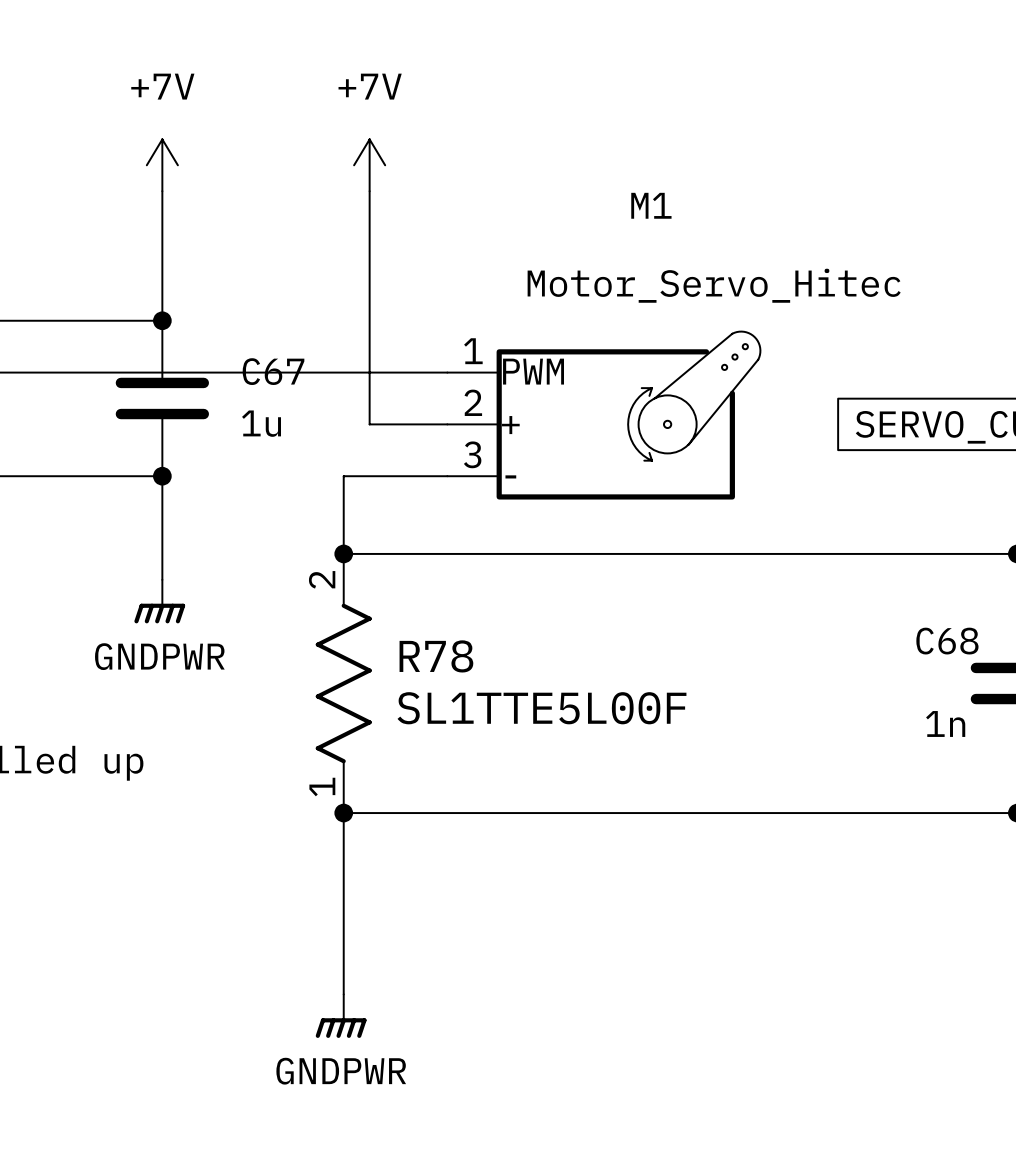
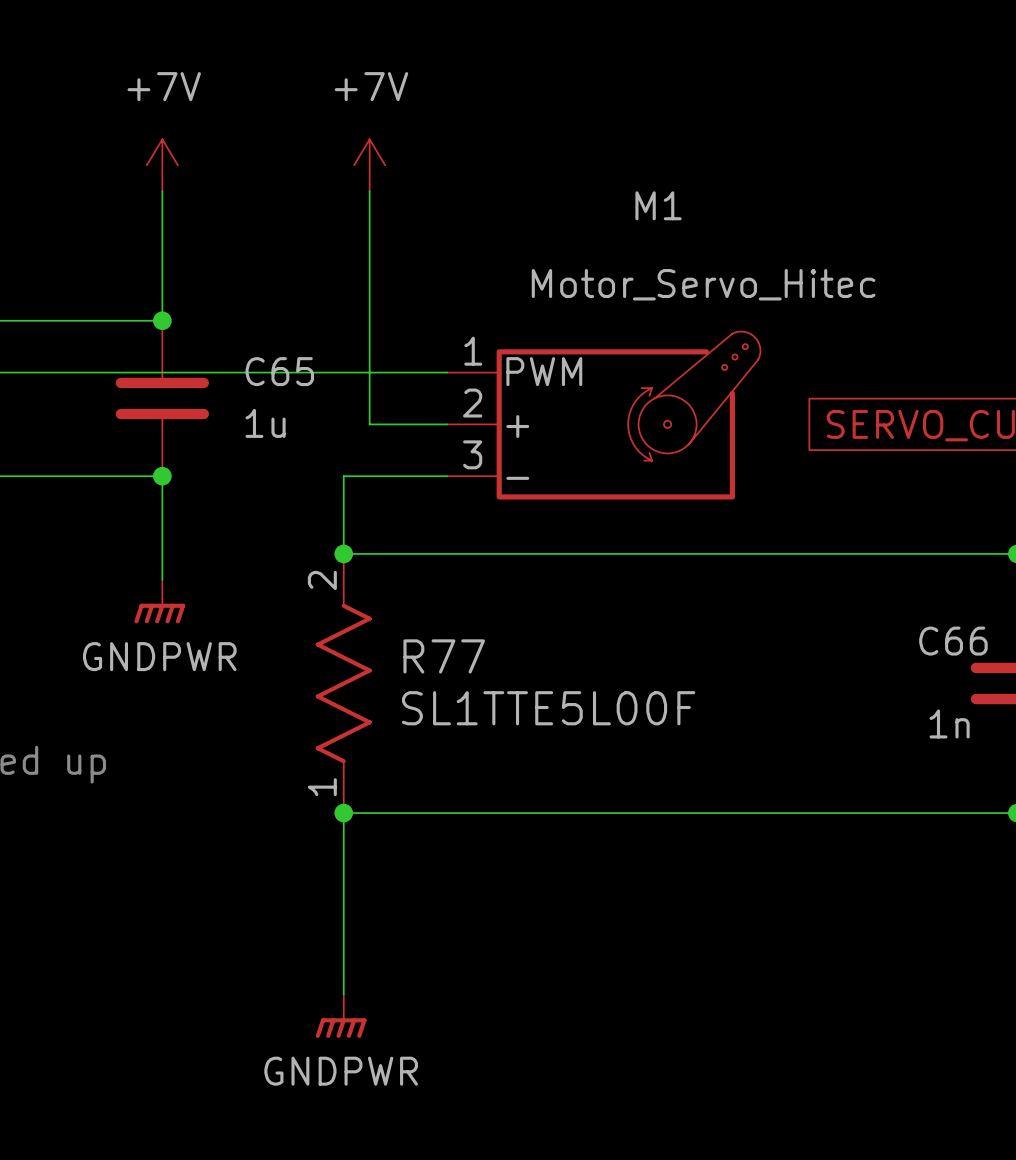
C67 name: C67 (273, 371) -> C65 (279, 371)
C68 name: C68 (947, 641) -> C66 (953, 641)
R78 name: R78 (436, 656) -> R77 (444, 656)

